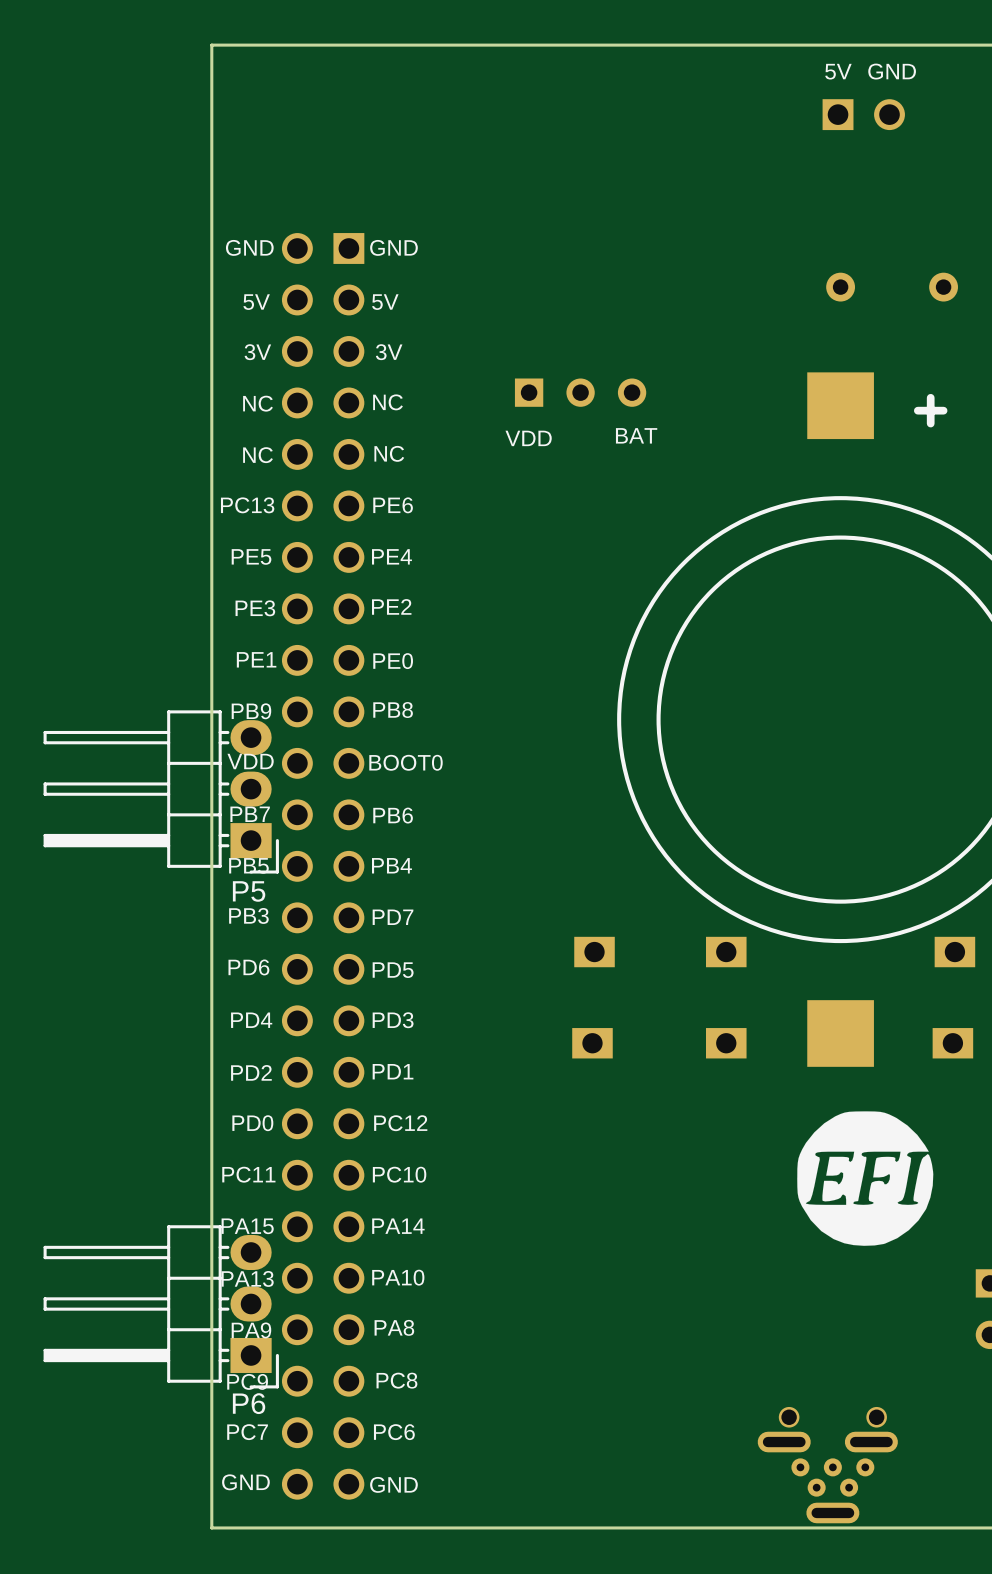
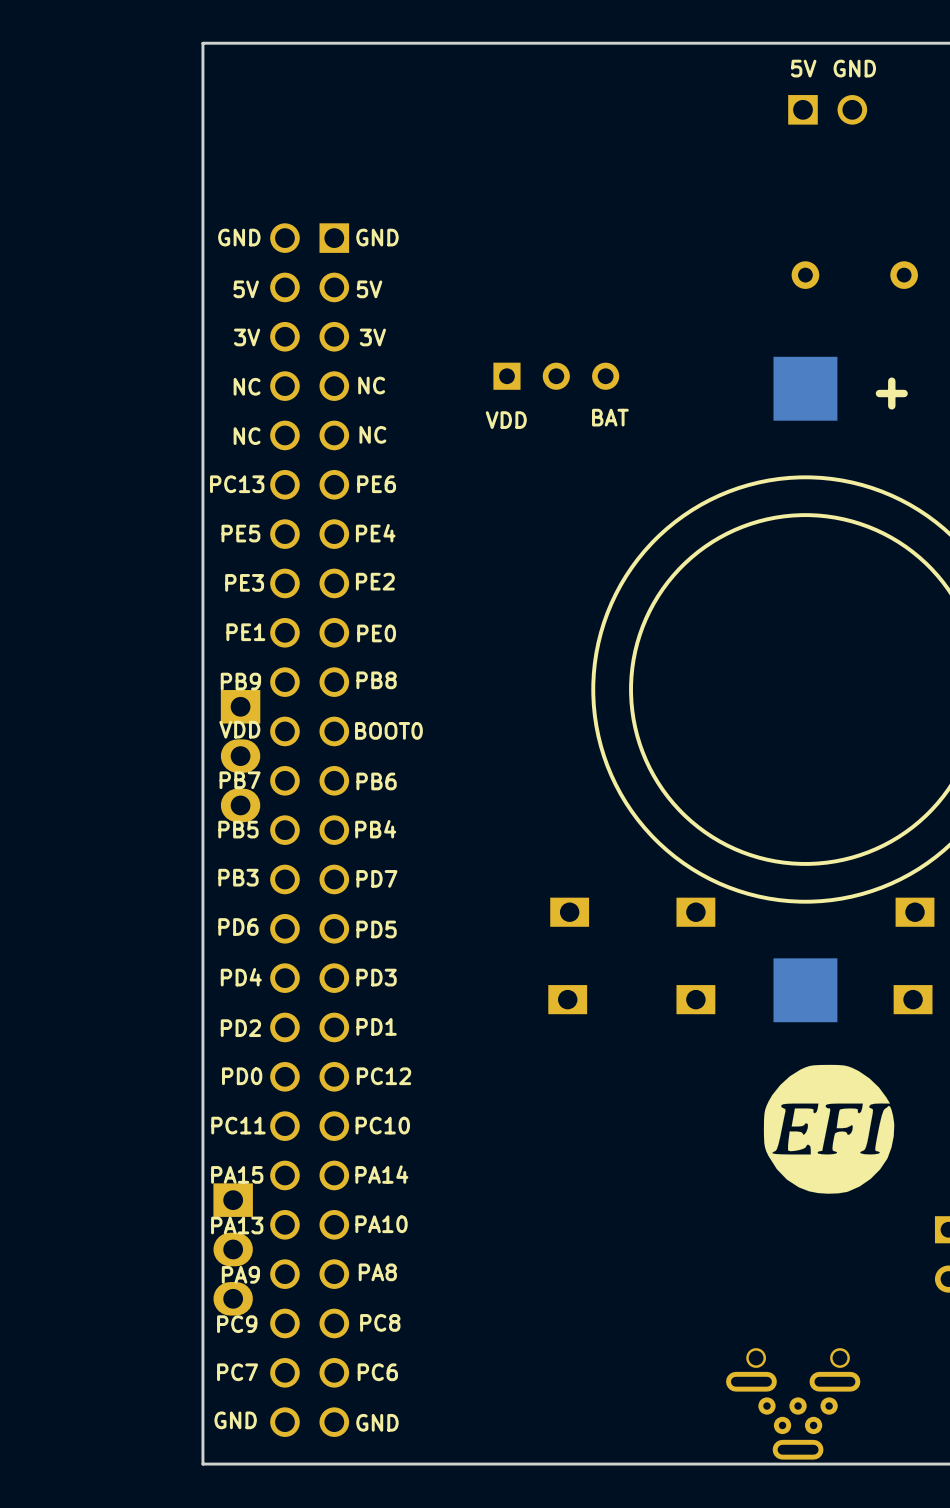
P5 side: bottom (161, 791) -> top (240, 756)
P6 side: bottom (161, 1306) -> top (233, 1249)

